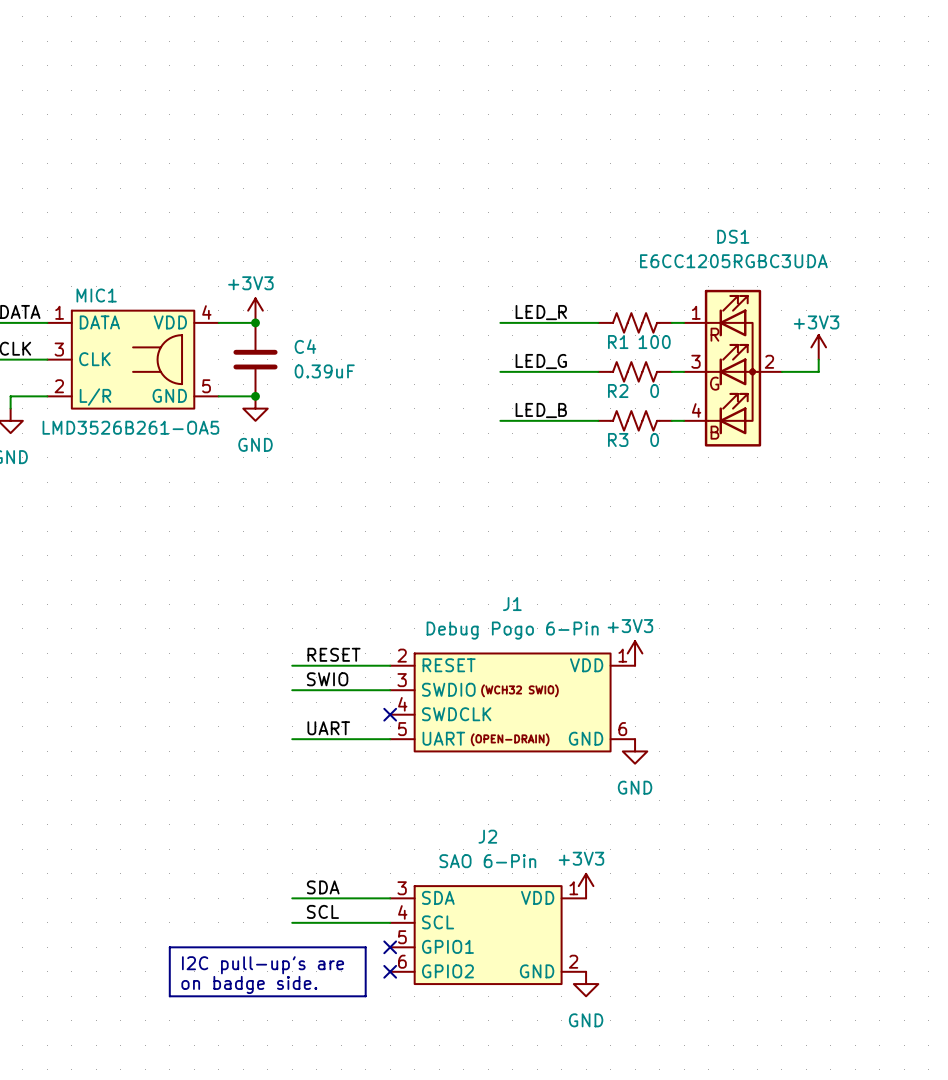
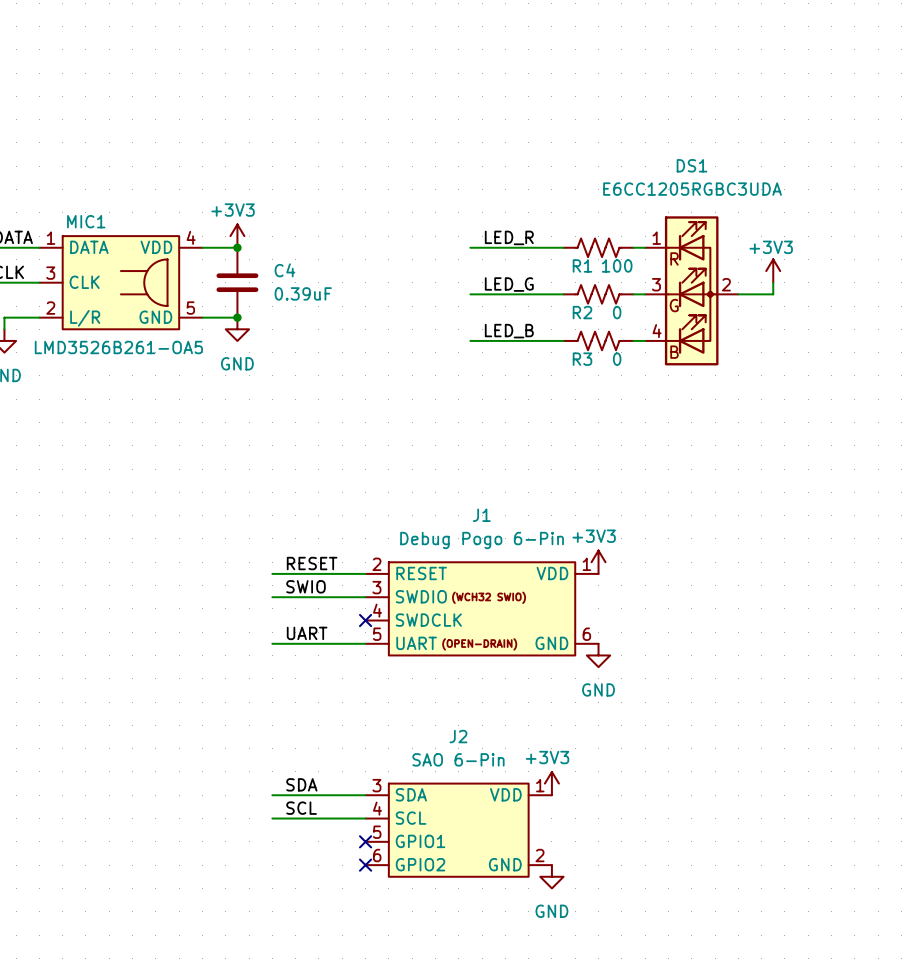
line: (169, 947) (365, 947) (365, 996) (169, 996) (169, 947) -> none
text: I2C pull-up's are (263, 965) -> none
text: on badge side. (249, 984) -> none

